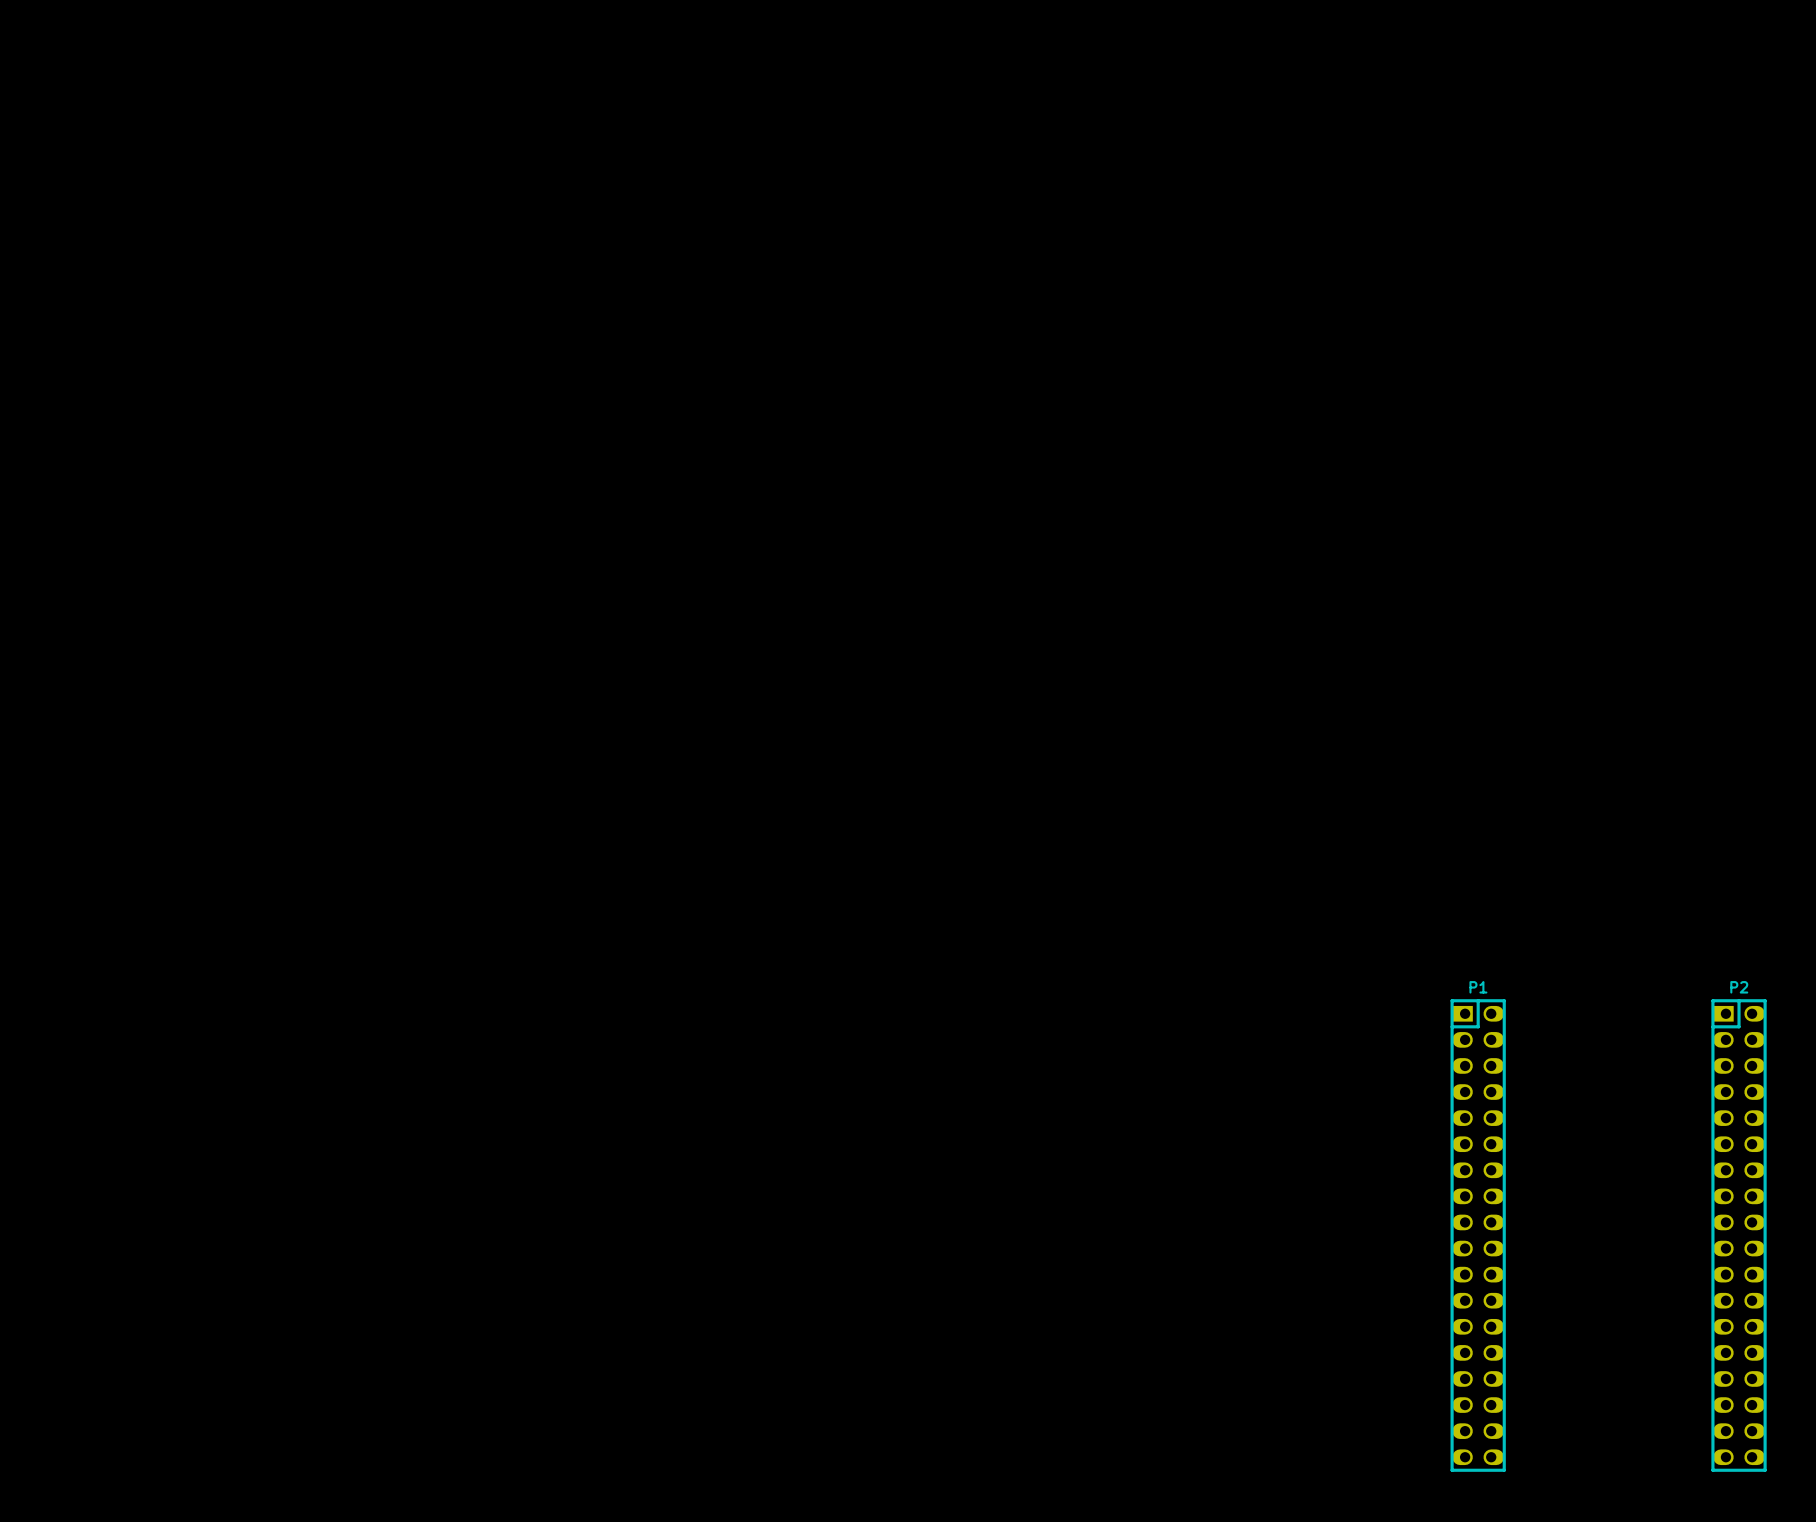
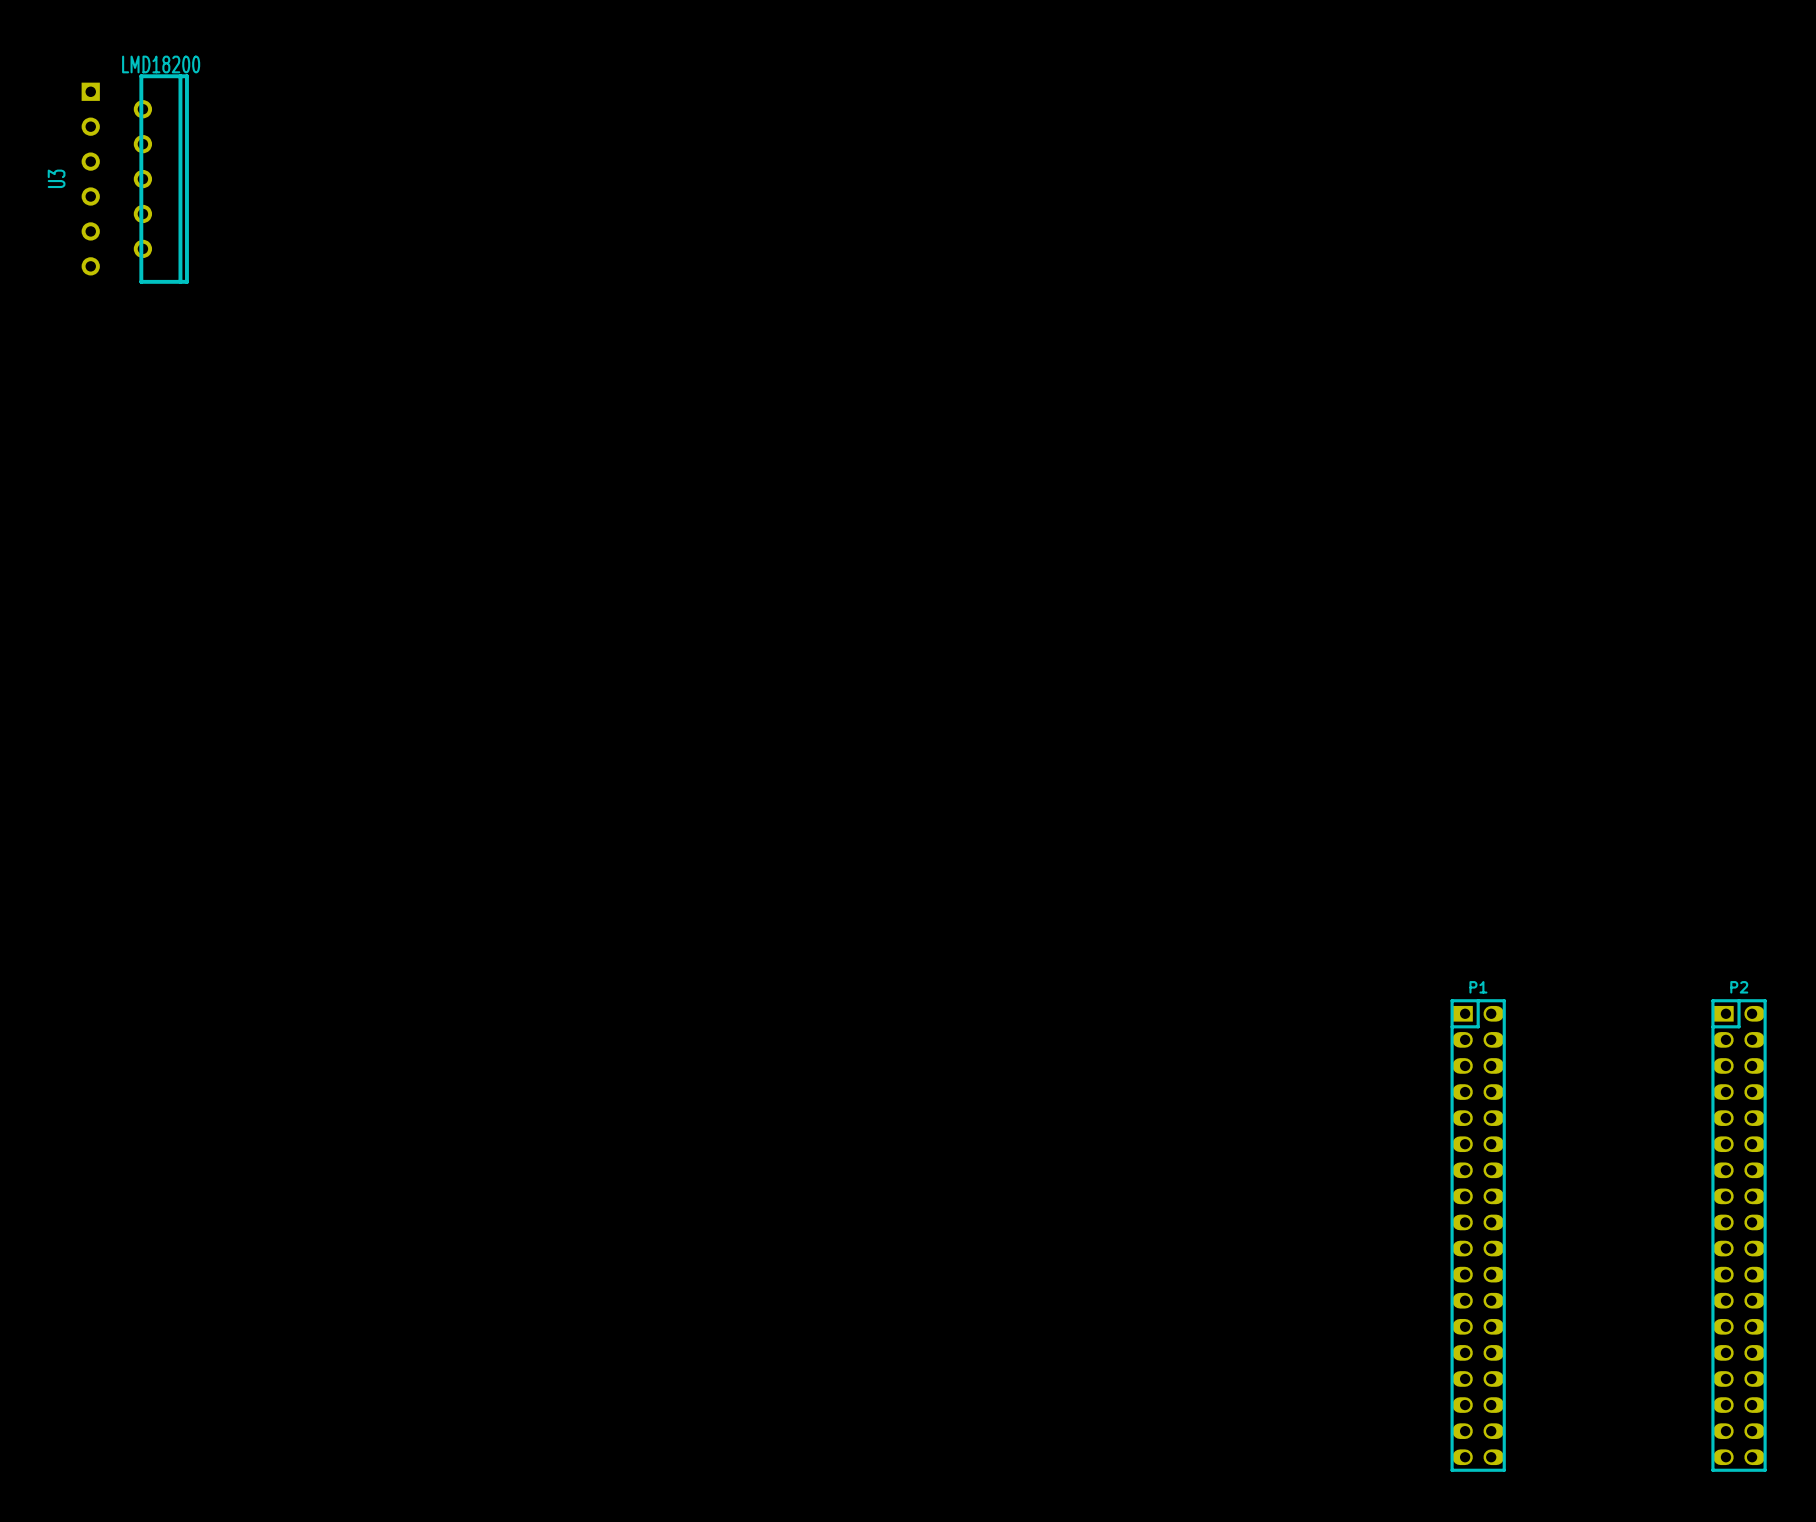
U3: none -> LMD18200 (135, 179)

